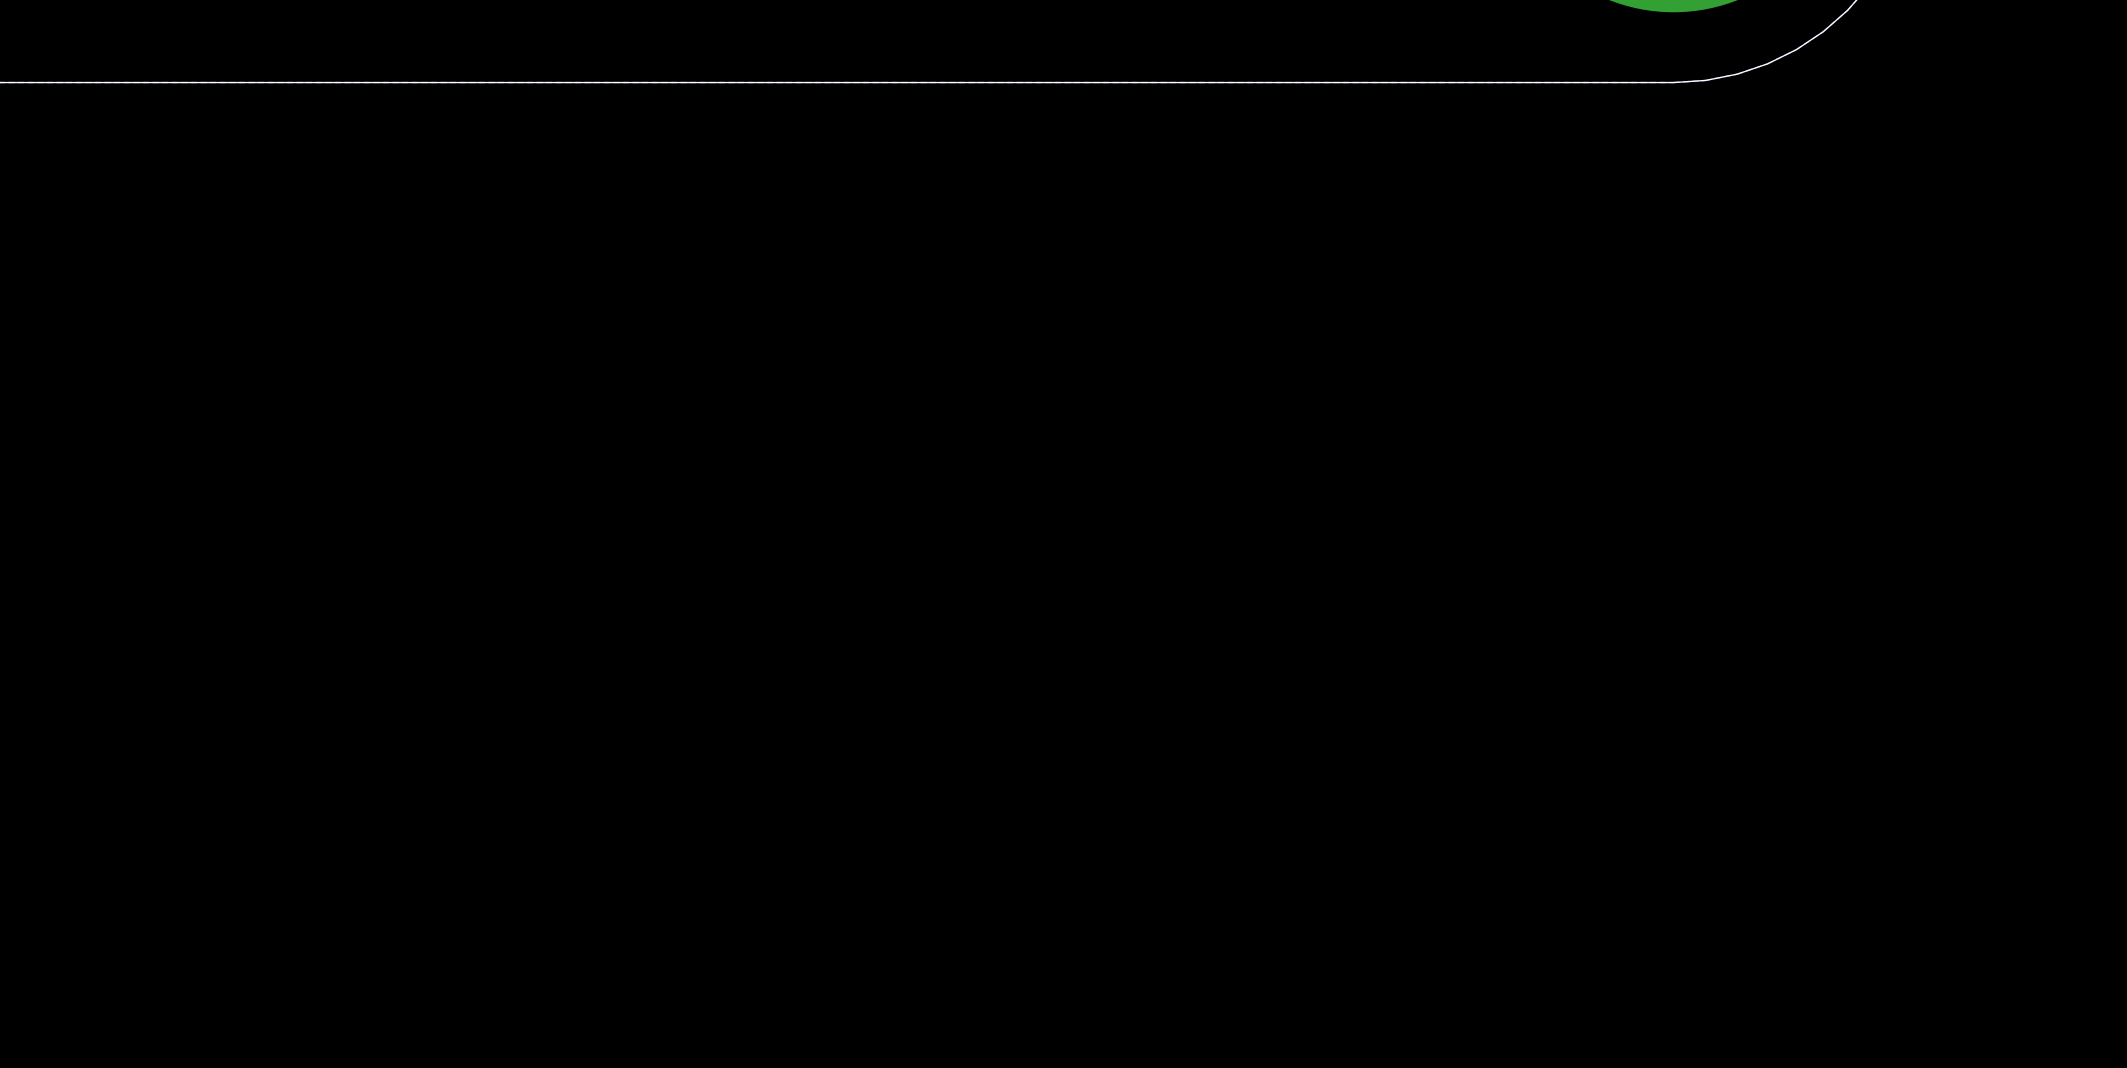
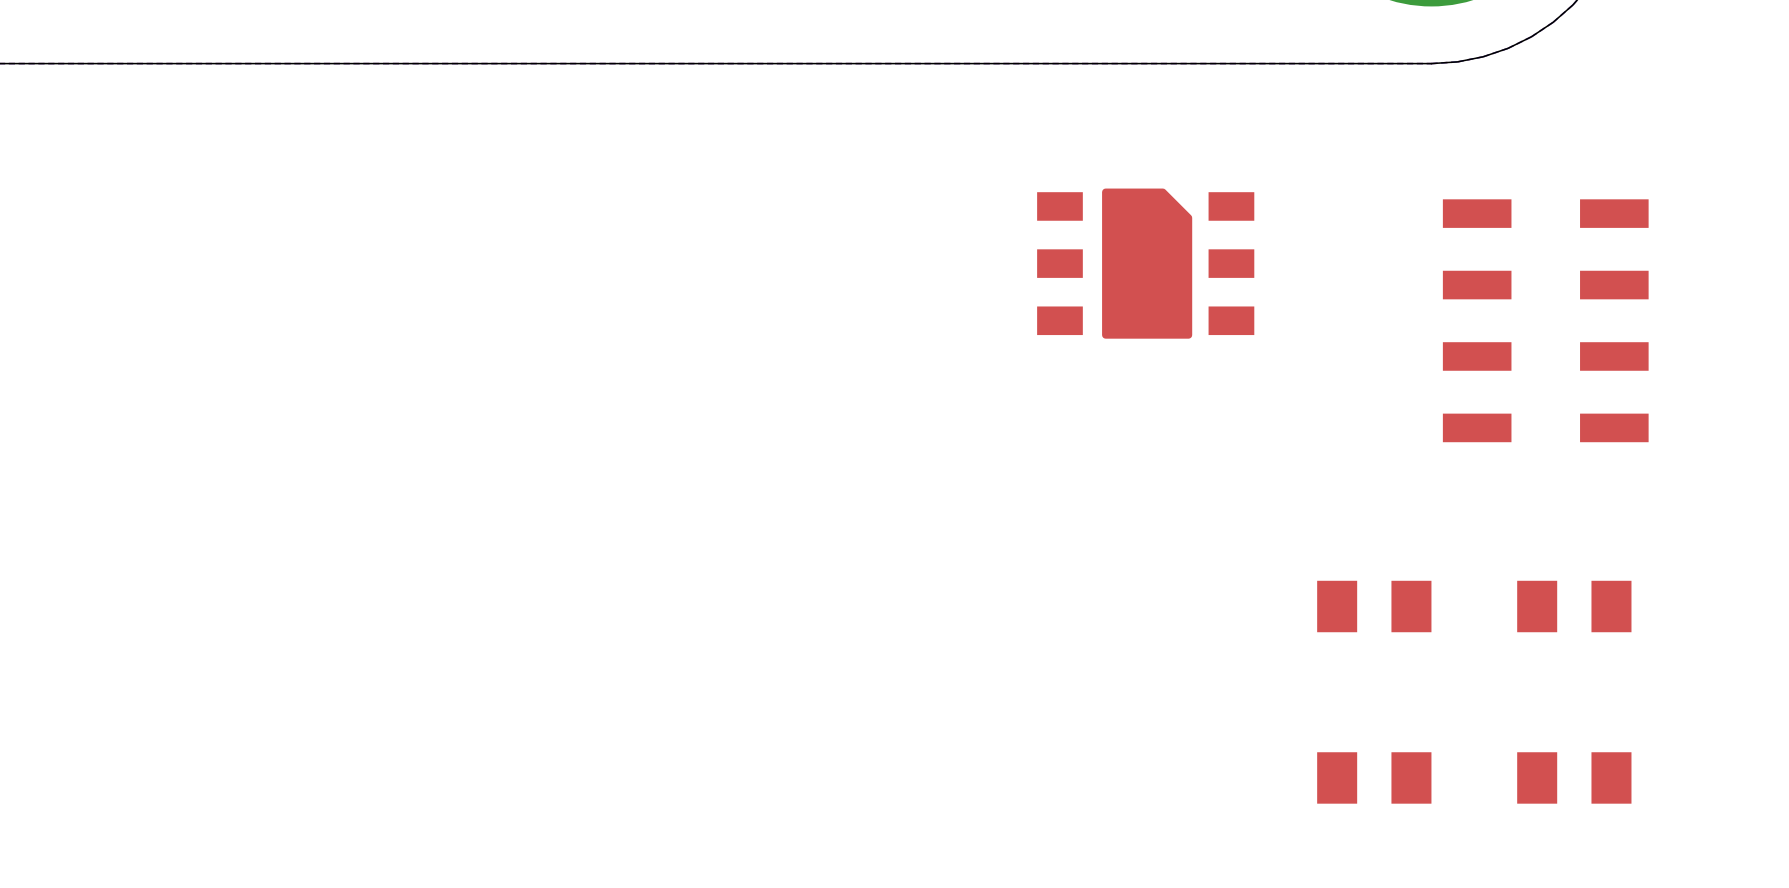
part: none -> (1145, 263)
part: none -> (1545, 320)
part: none -> (1374, 606)
part: none -> (1574, 606)
part: none -> (1374, 777)
part: none -> (1574, 777)

